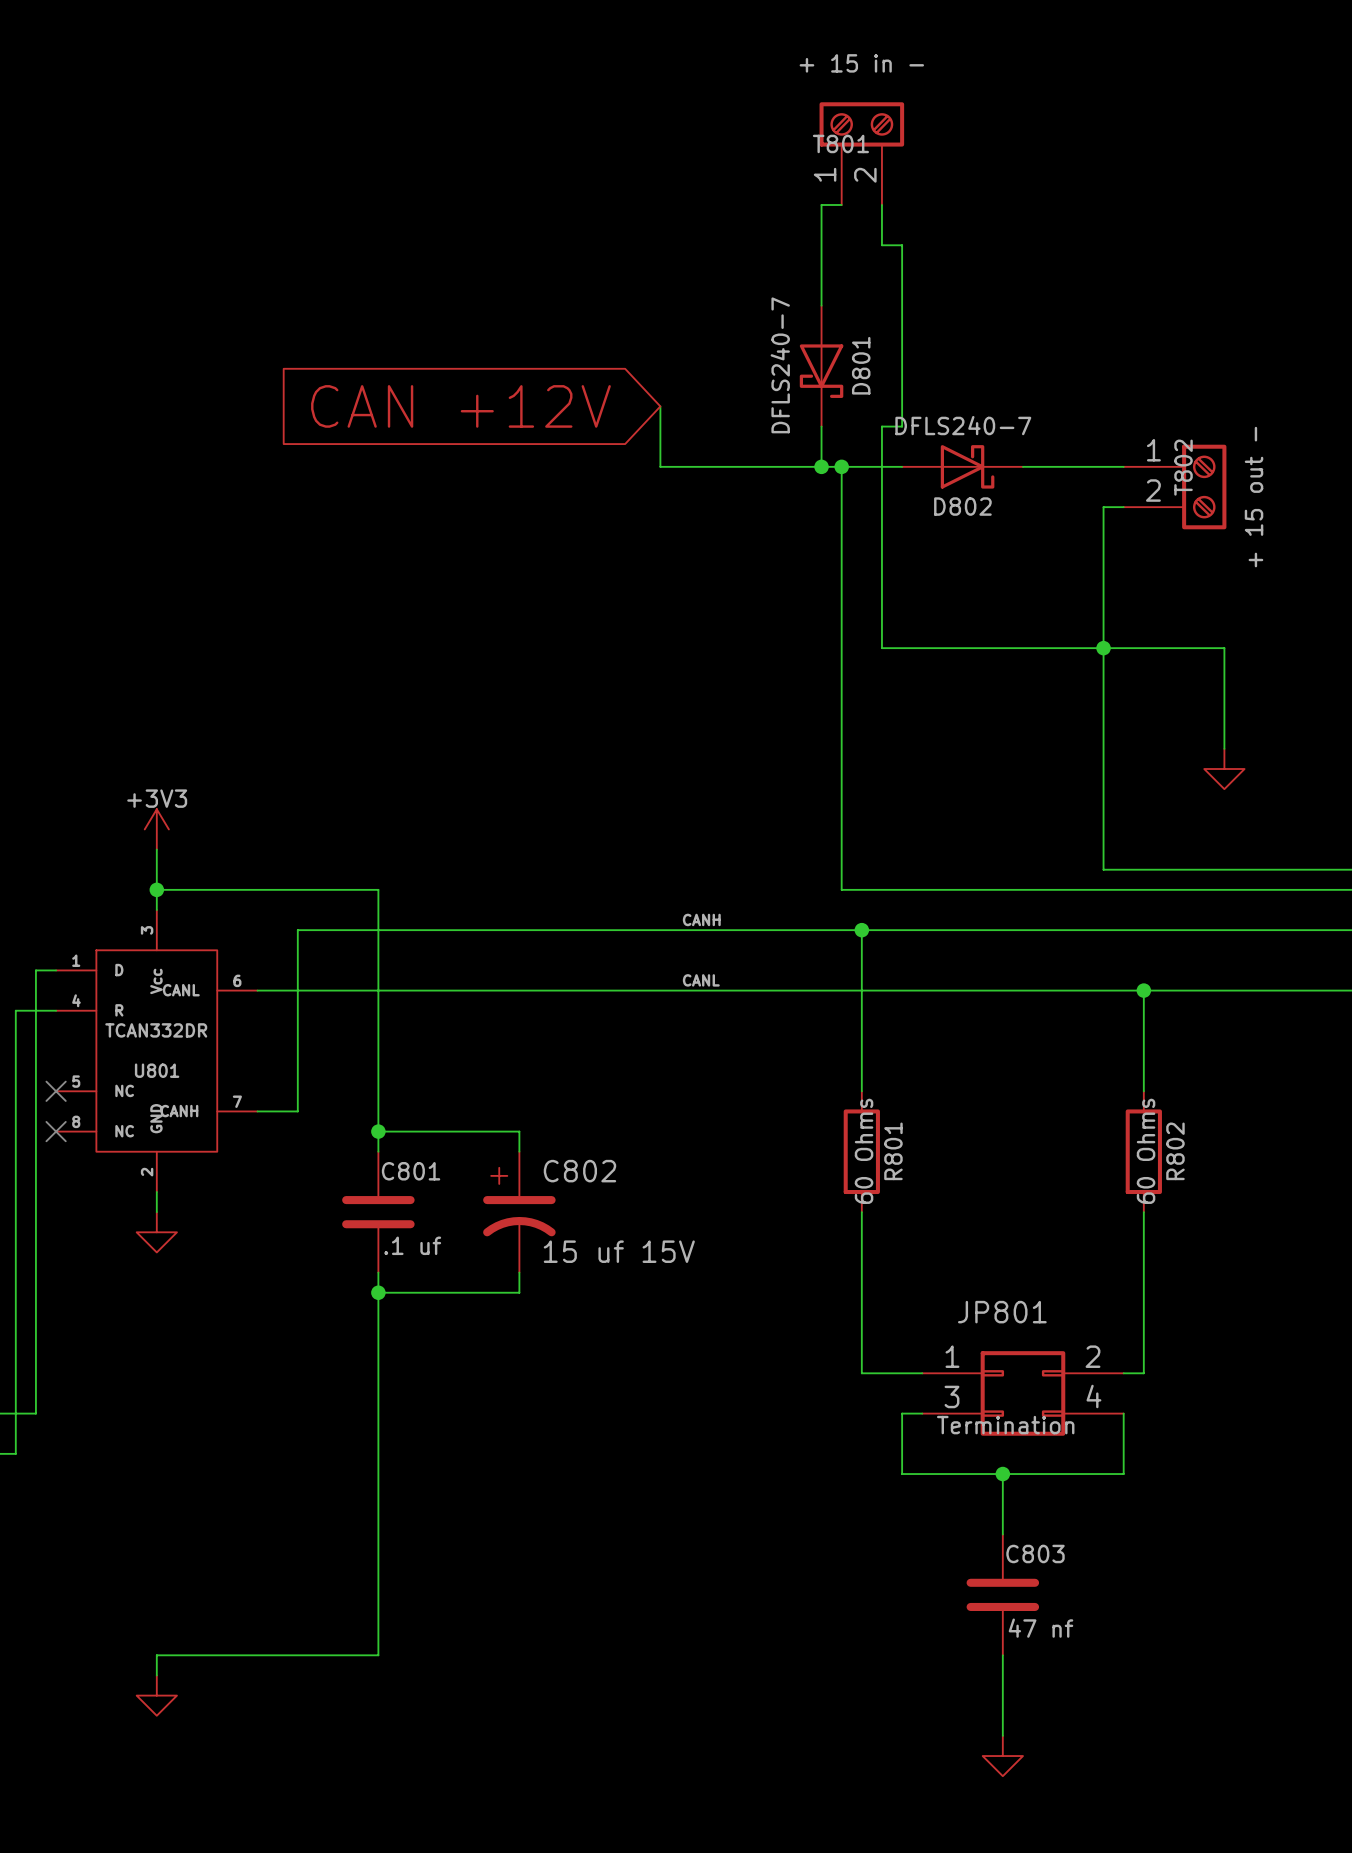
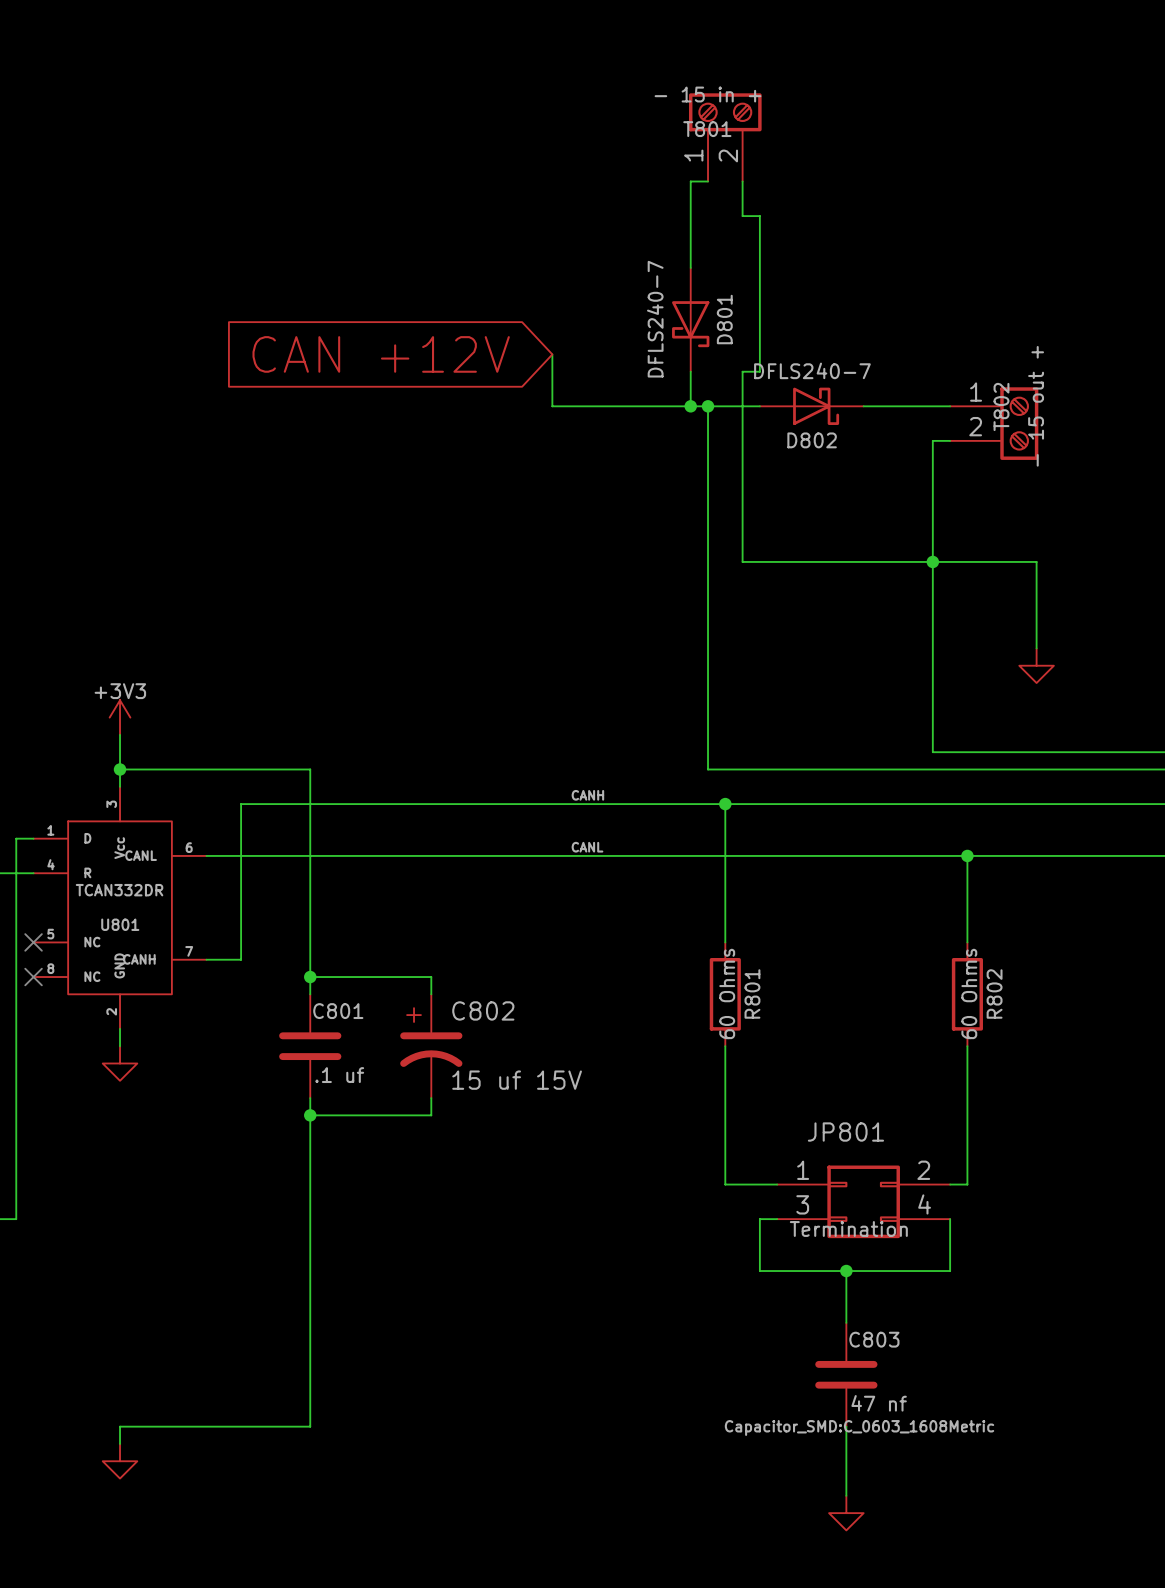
T801 value: + 15 in - (861, 63) -> - 15 in + (708, 94)
T802 value: + 15 out - (1254, 497) -> - 15 out + (1036, 406)
C803 text: none -> Capacitor_SMD:C_0603_1608Metric (859, 1428)

